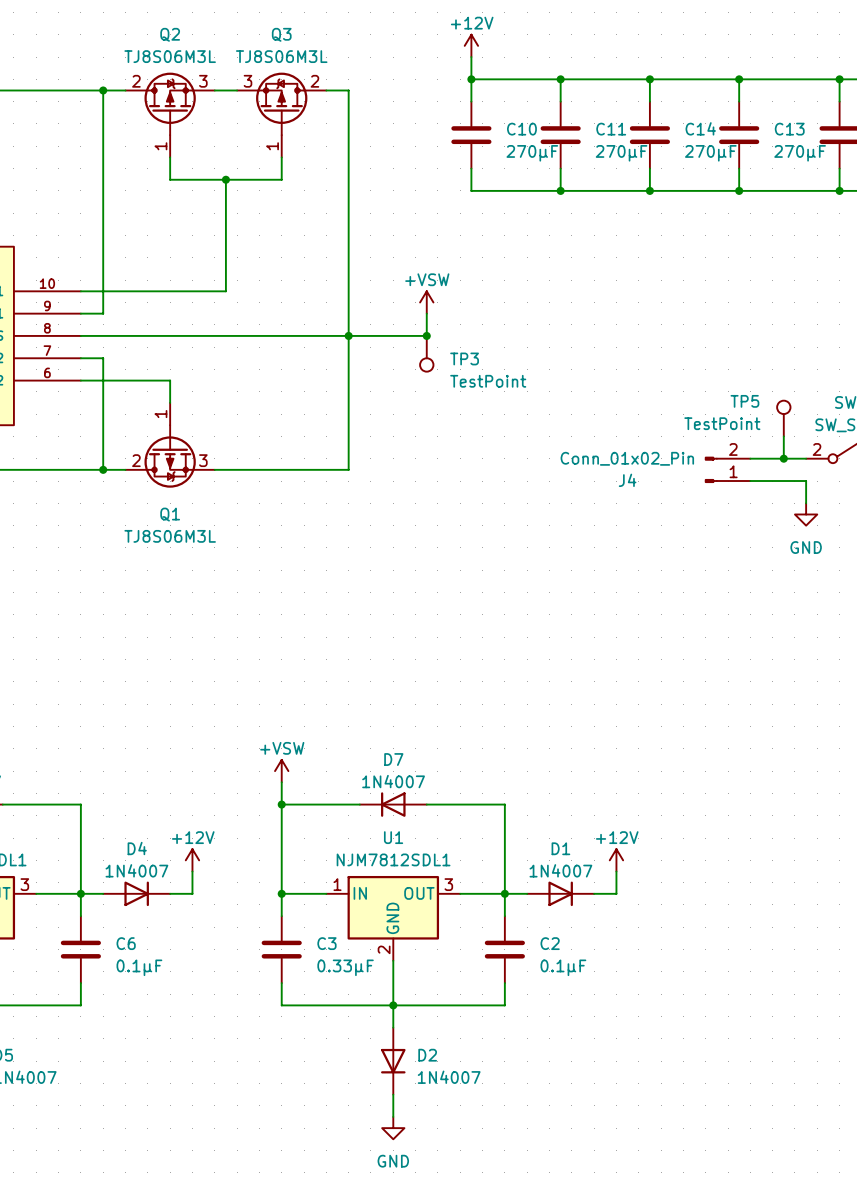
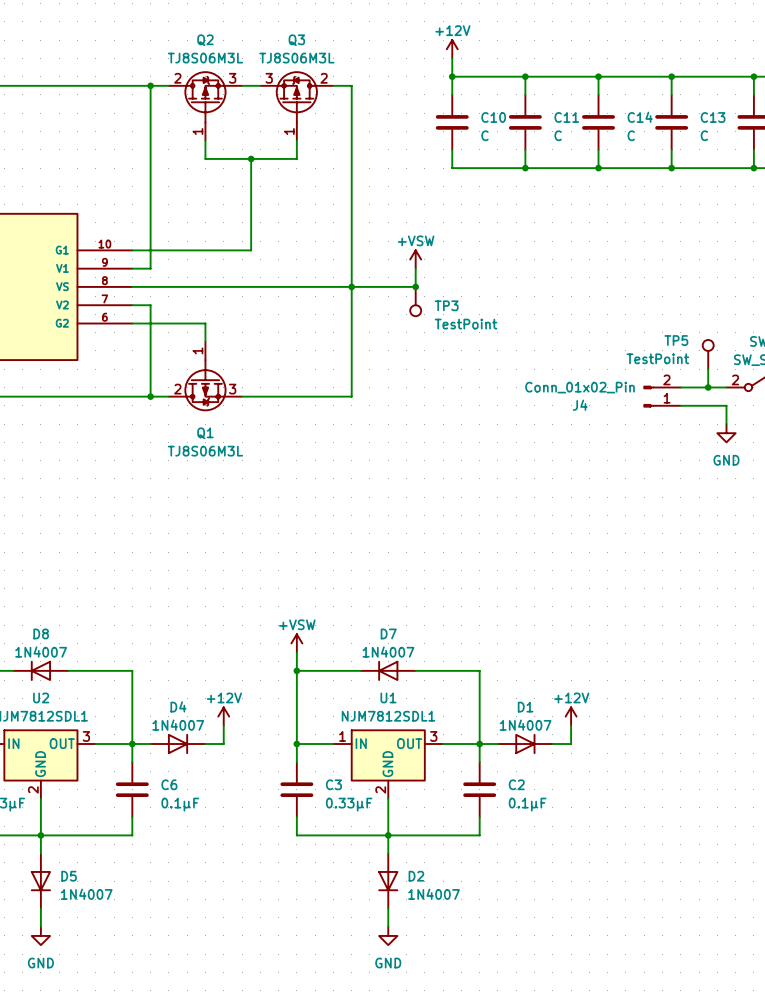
C10 value: 270μF (532, 153) -> C (484, 135)
C11 value: 270μF (621, 153) -> C (558, 135)
C14 value: 270μF (710, 153) -> C (631, 135)
C13 value: 270μF (800, 153) -> C (704, 135)

